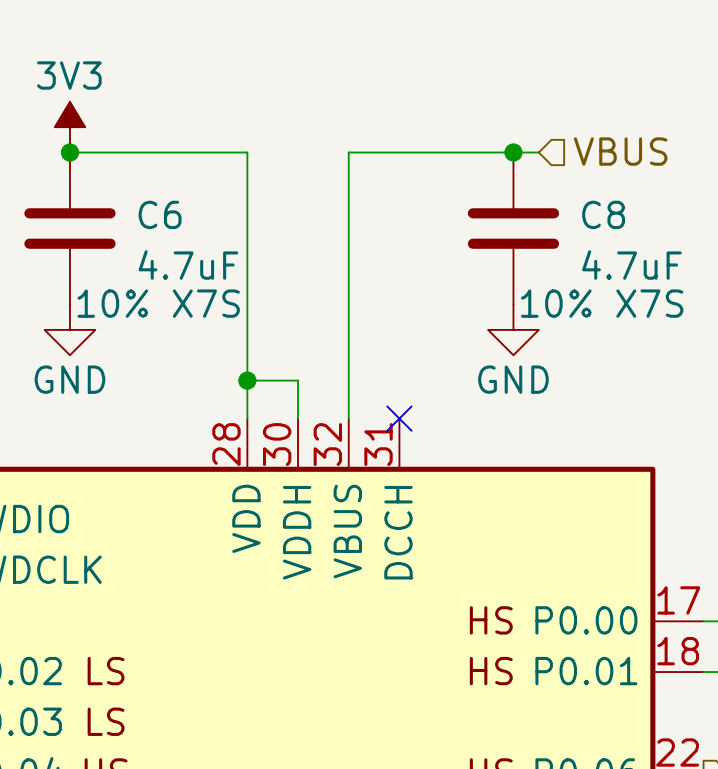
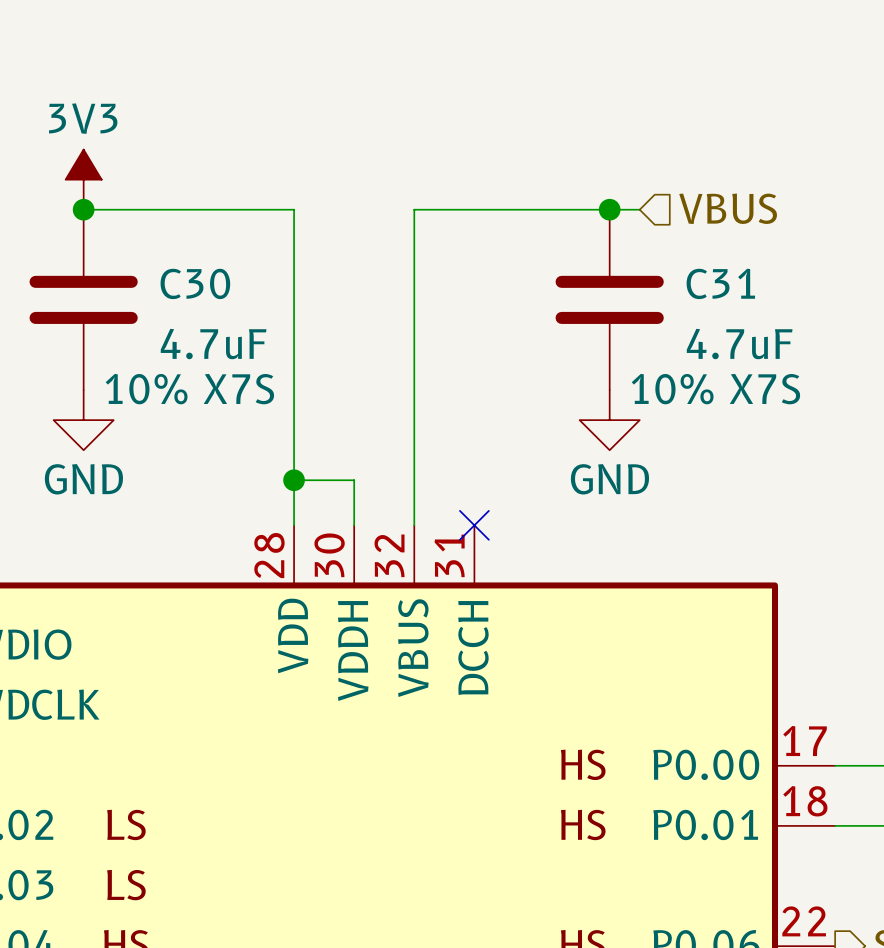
C6 name: C6 (160, 214) -> C30 (195, 283)
C8 name: C8 (603, 214) -> C31 (720, 283)

